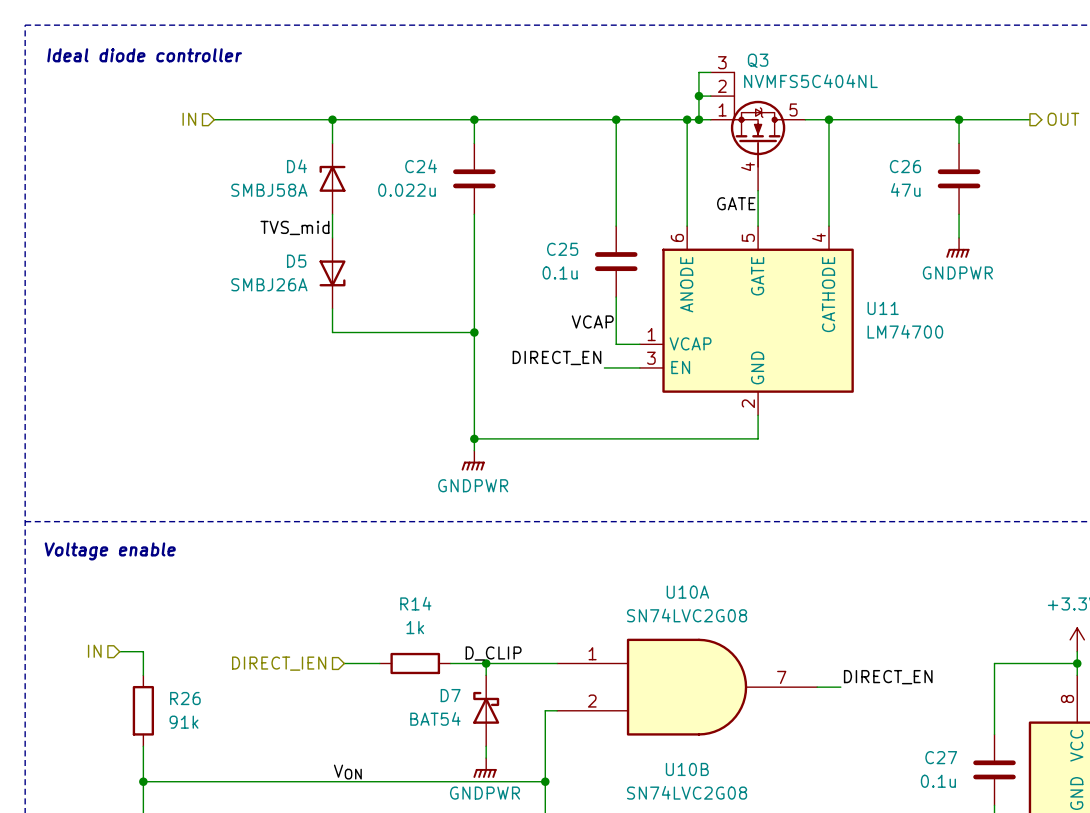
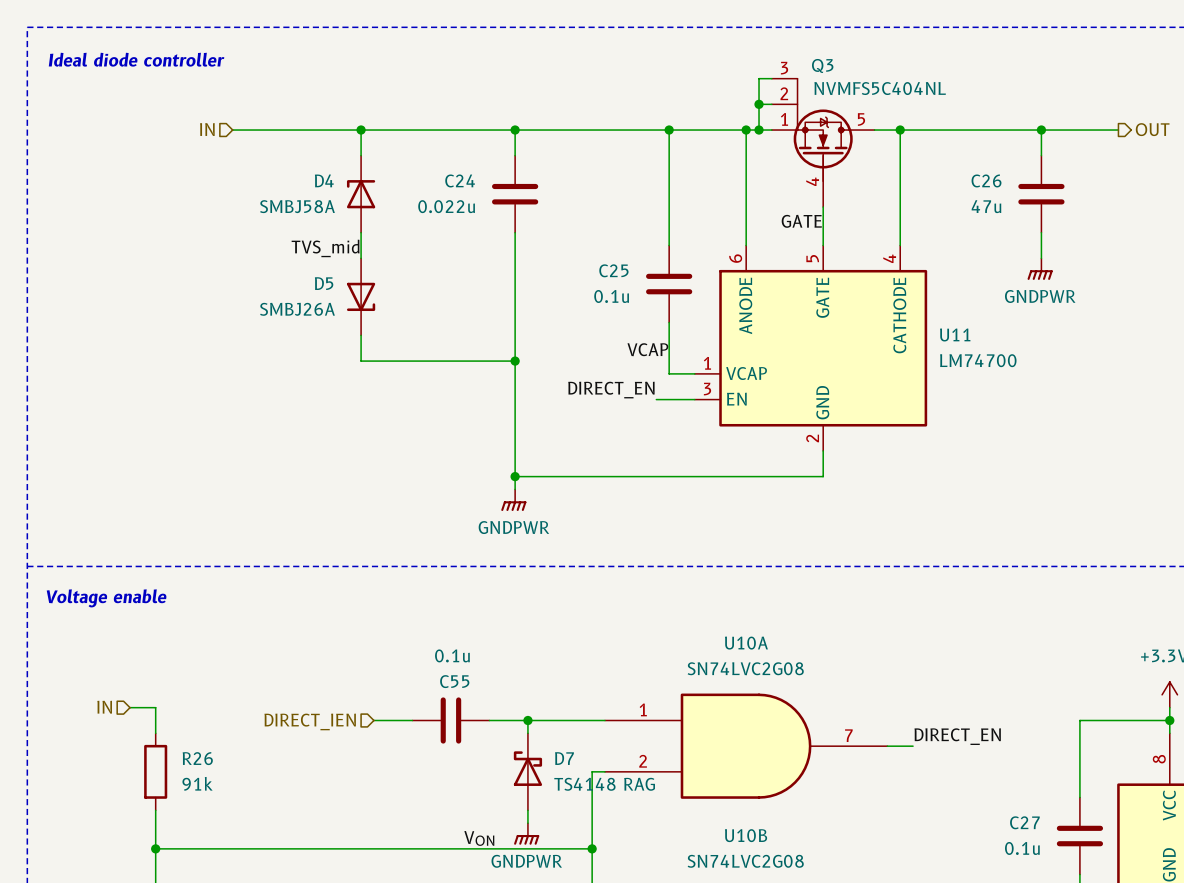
label: D_CLIP (493, 653) -> none
R14: 1k (415, 663) -> none
C55: none -> 0.1u (450, 720)
D7 name position: D7 (450, 695) -> D7 (564, 758)
D7 value: BAT54 (435, 718) -> TS4148 RAG (604, 784)
label position: VON (347, 772) -> VON (479, 838)

